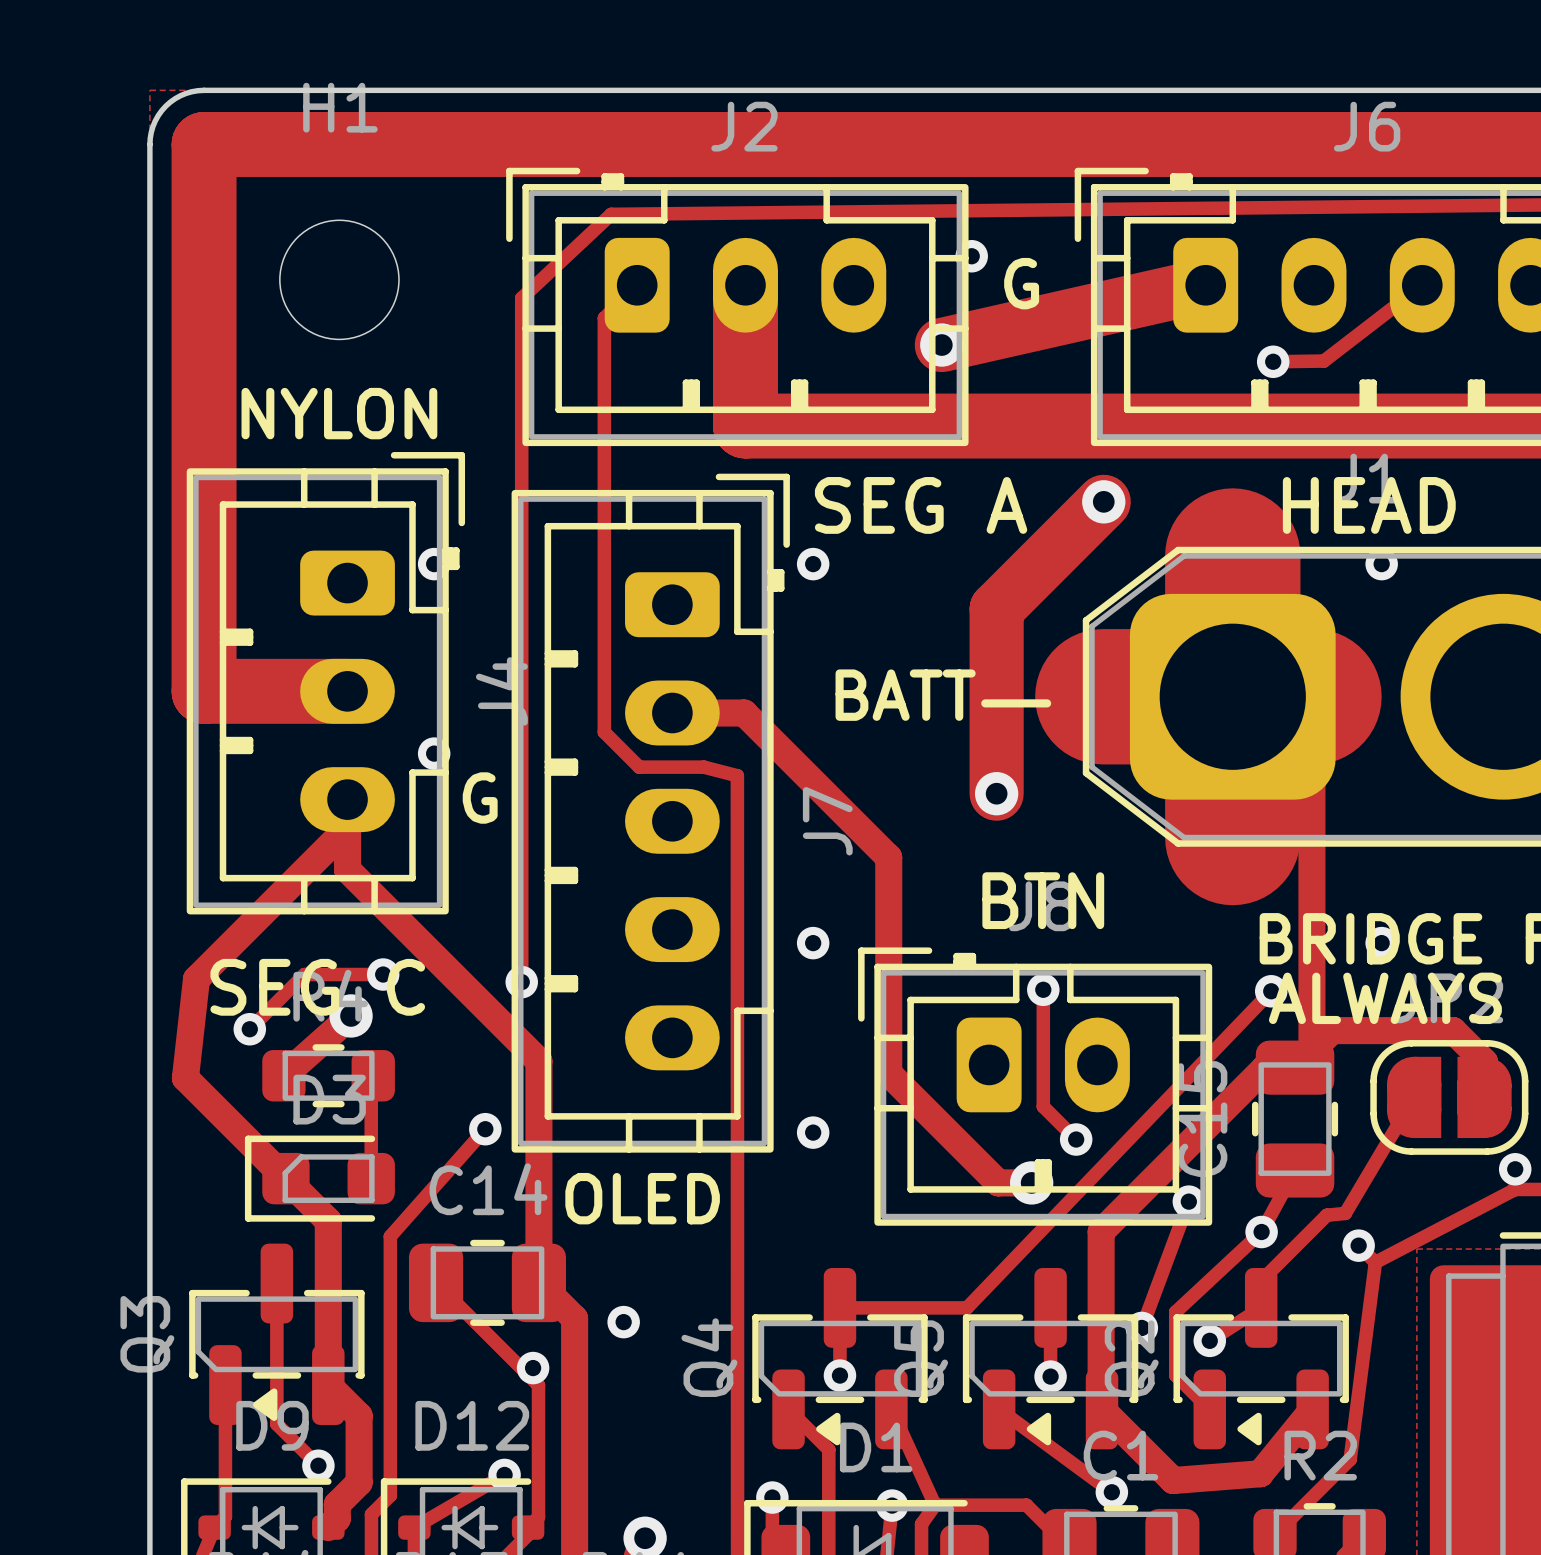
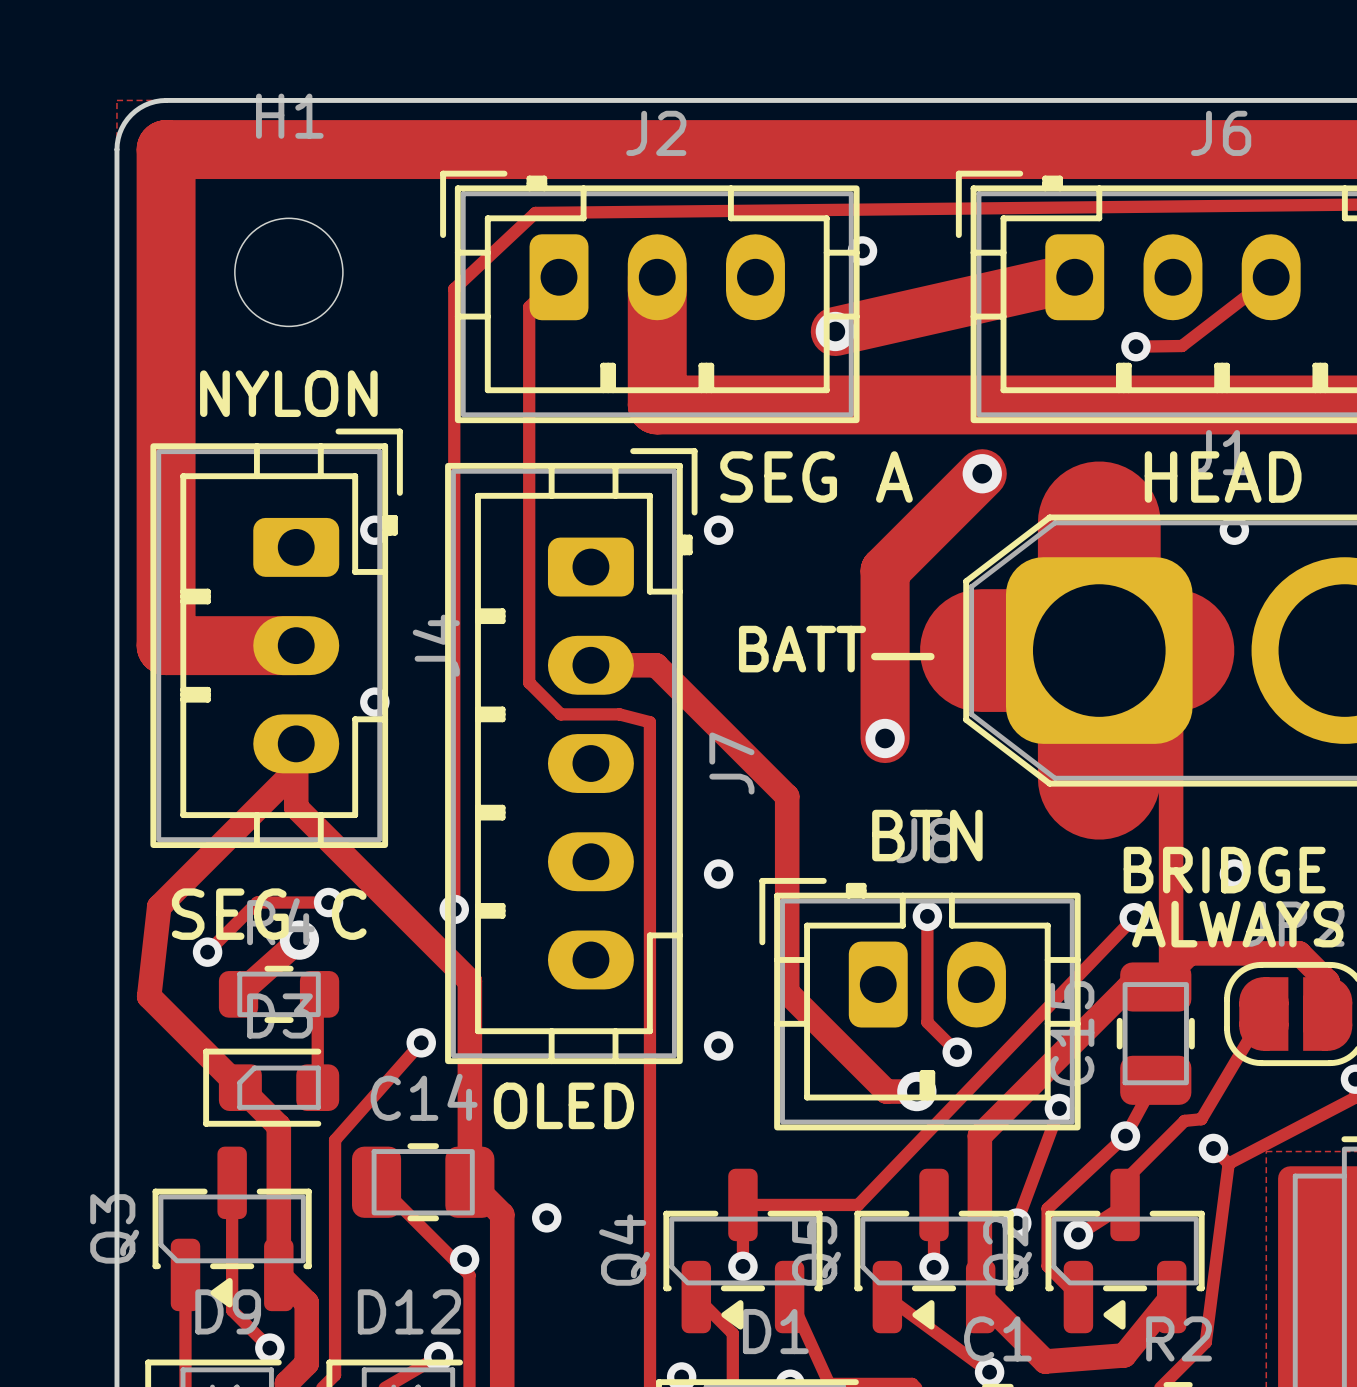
text: G (1021, 283) -> none
text: G (480, 798) -> none

